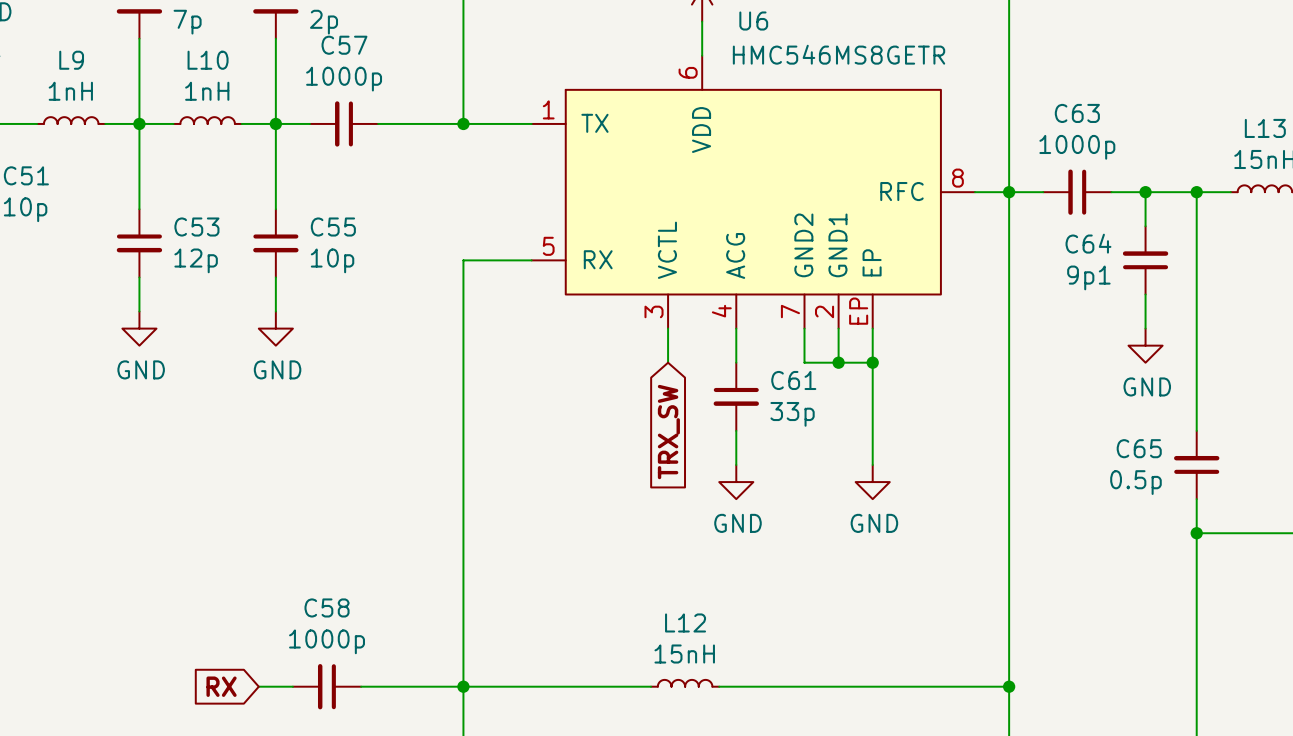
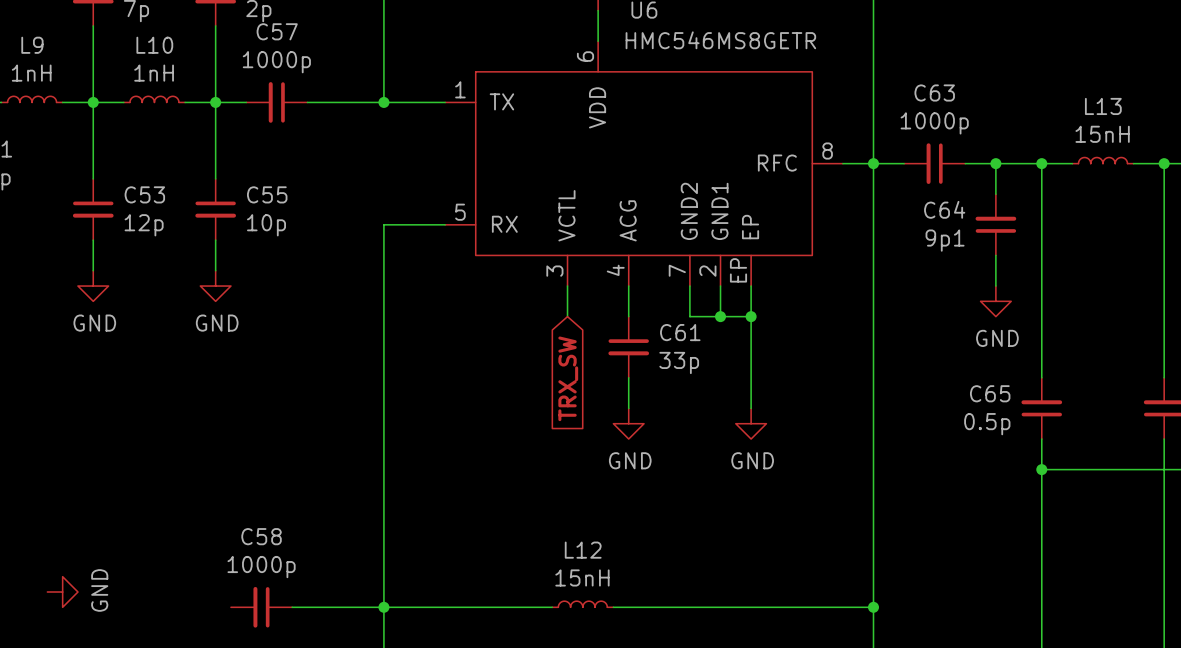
power symbol: none -> GND (62, 592)
global label: RX (221, 686) -> none
wire: (258, 686) (292, 686) -> none

